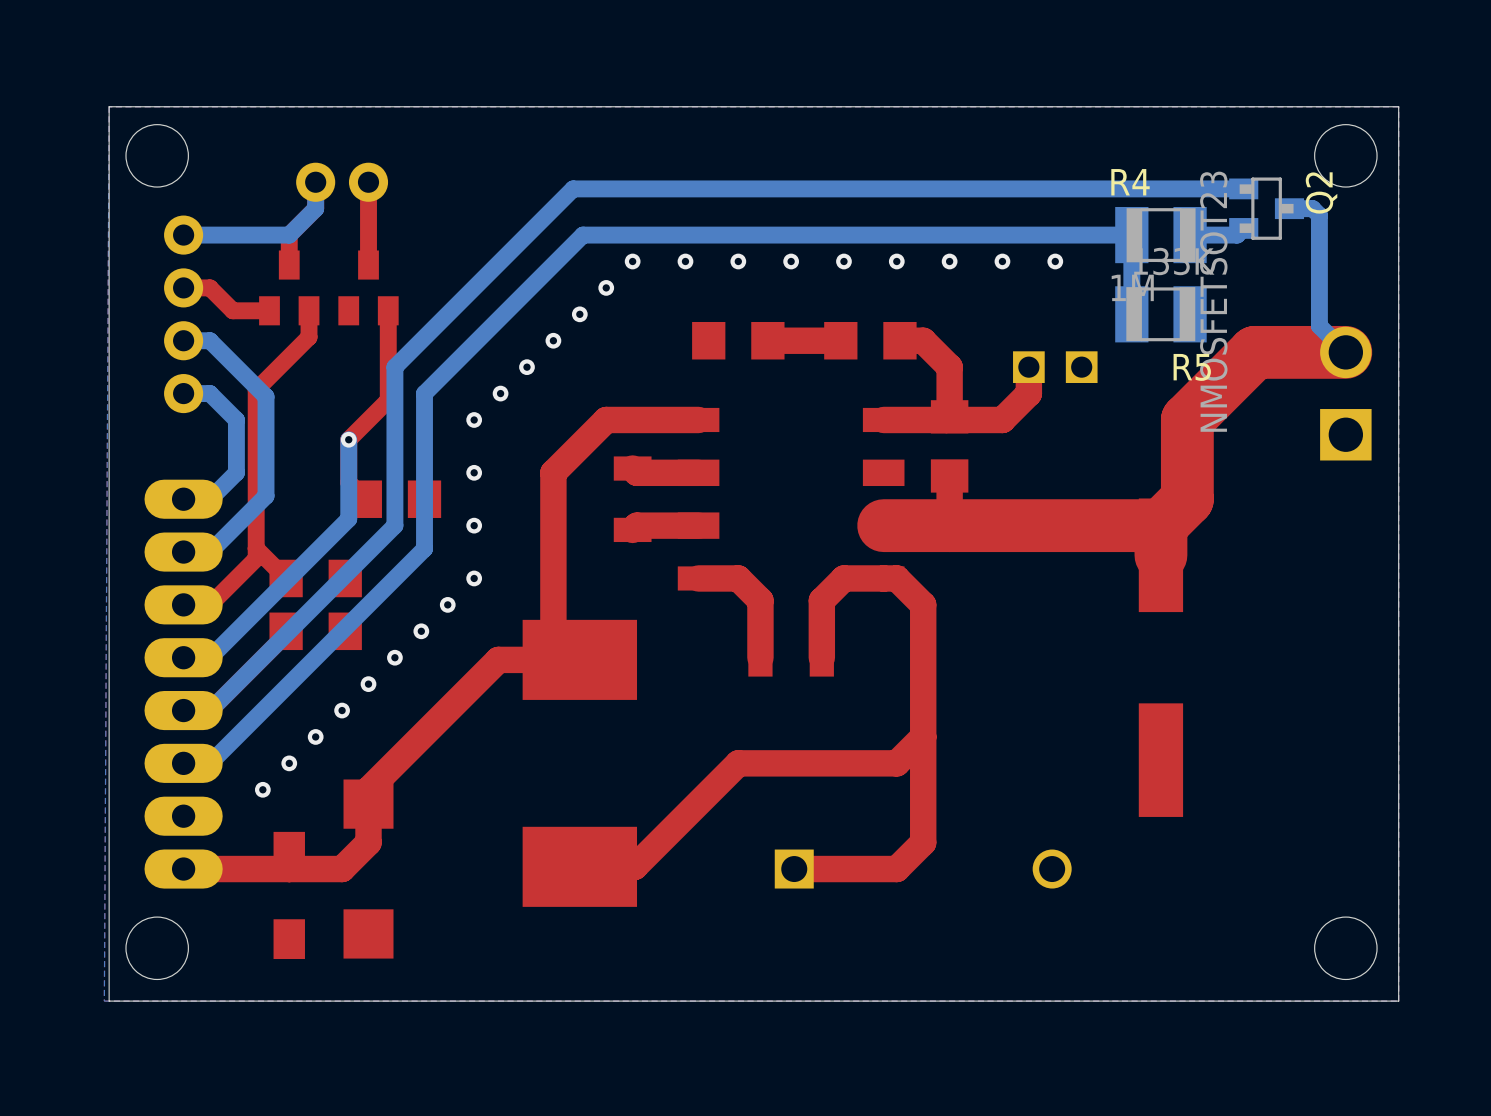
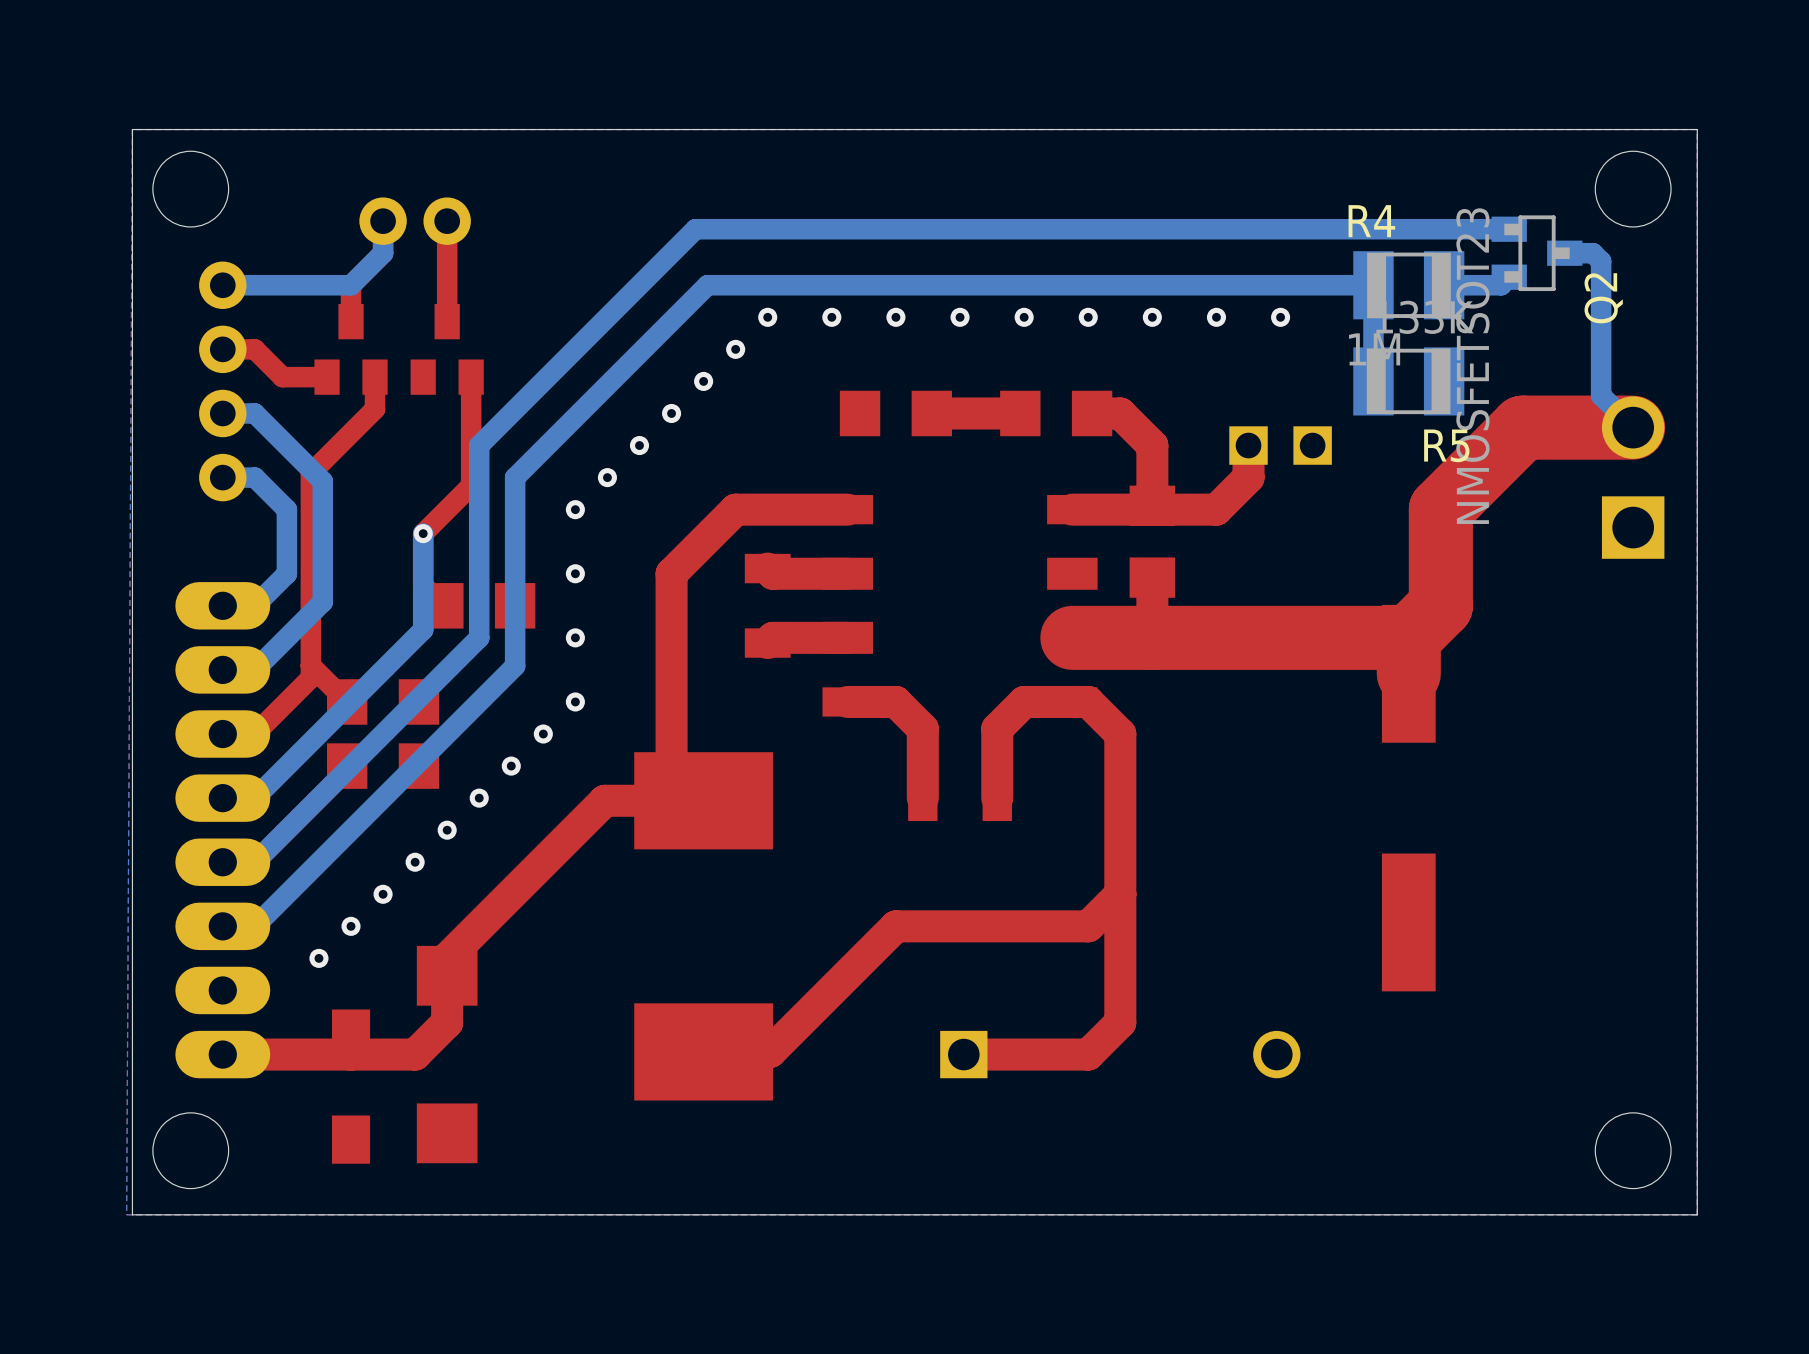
Q2 name position: Q2 (1321, 192) -> Q2 (1603, 298)

